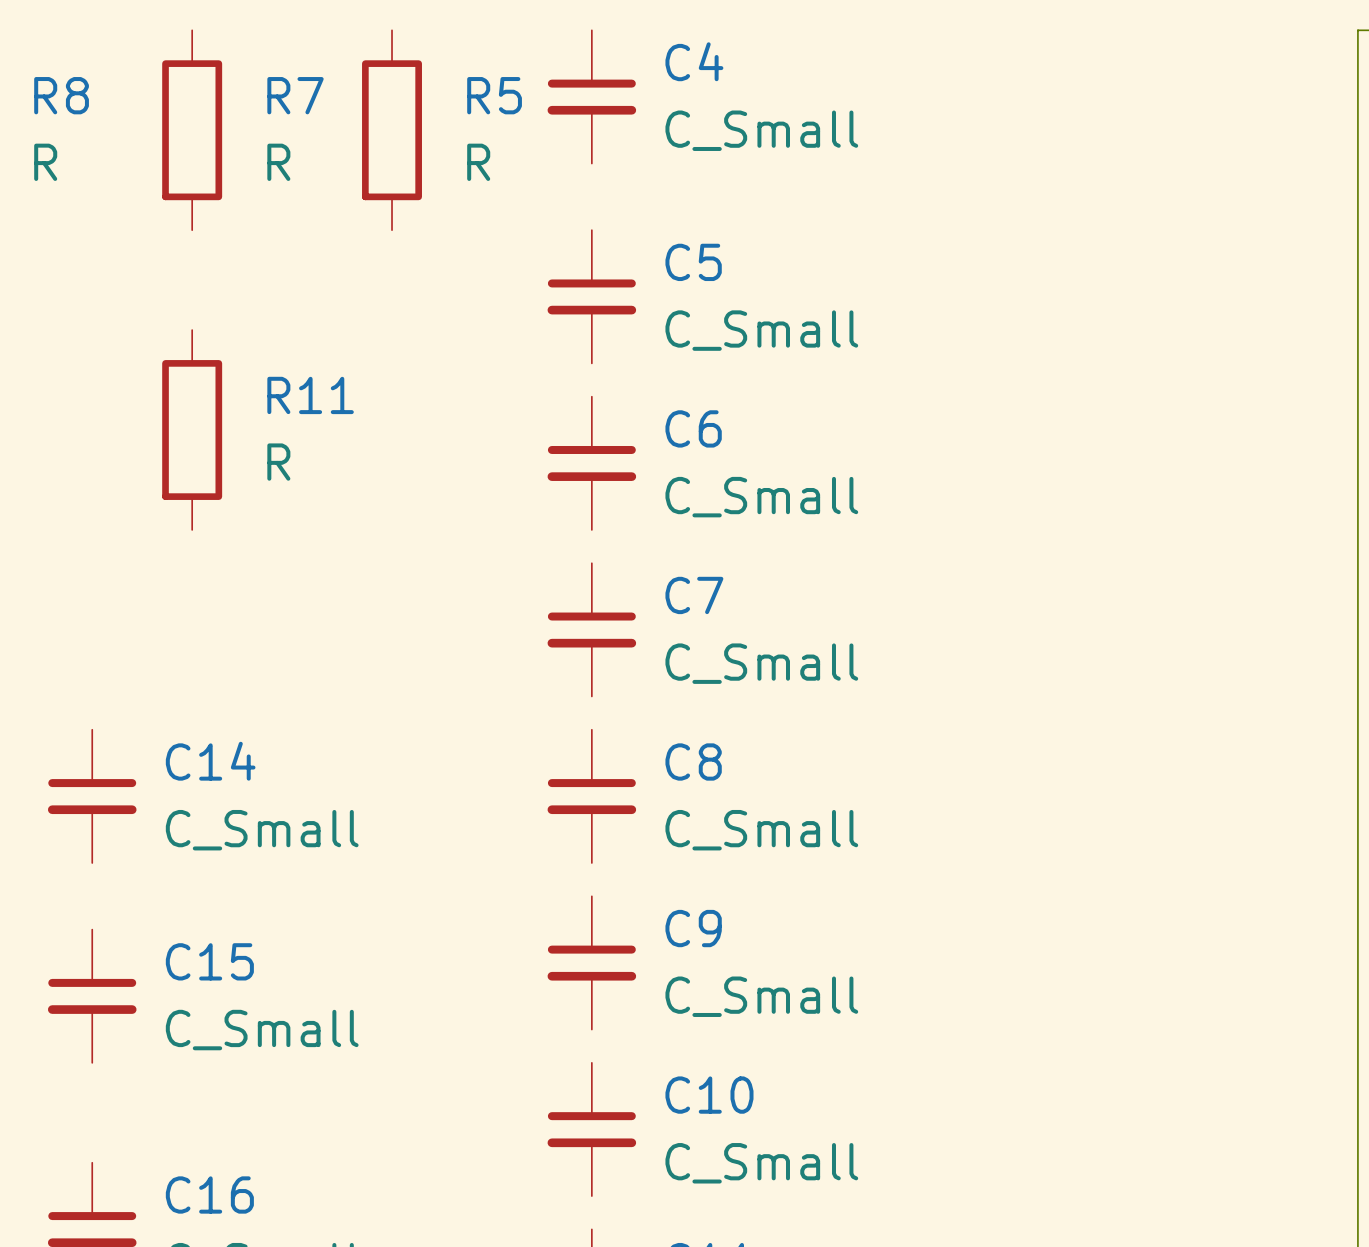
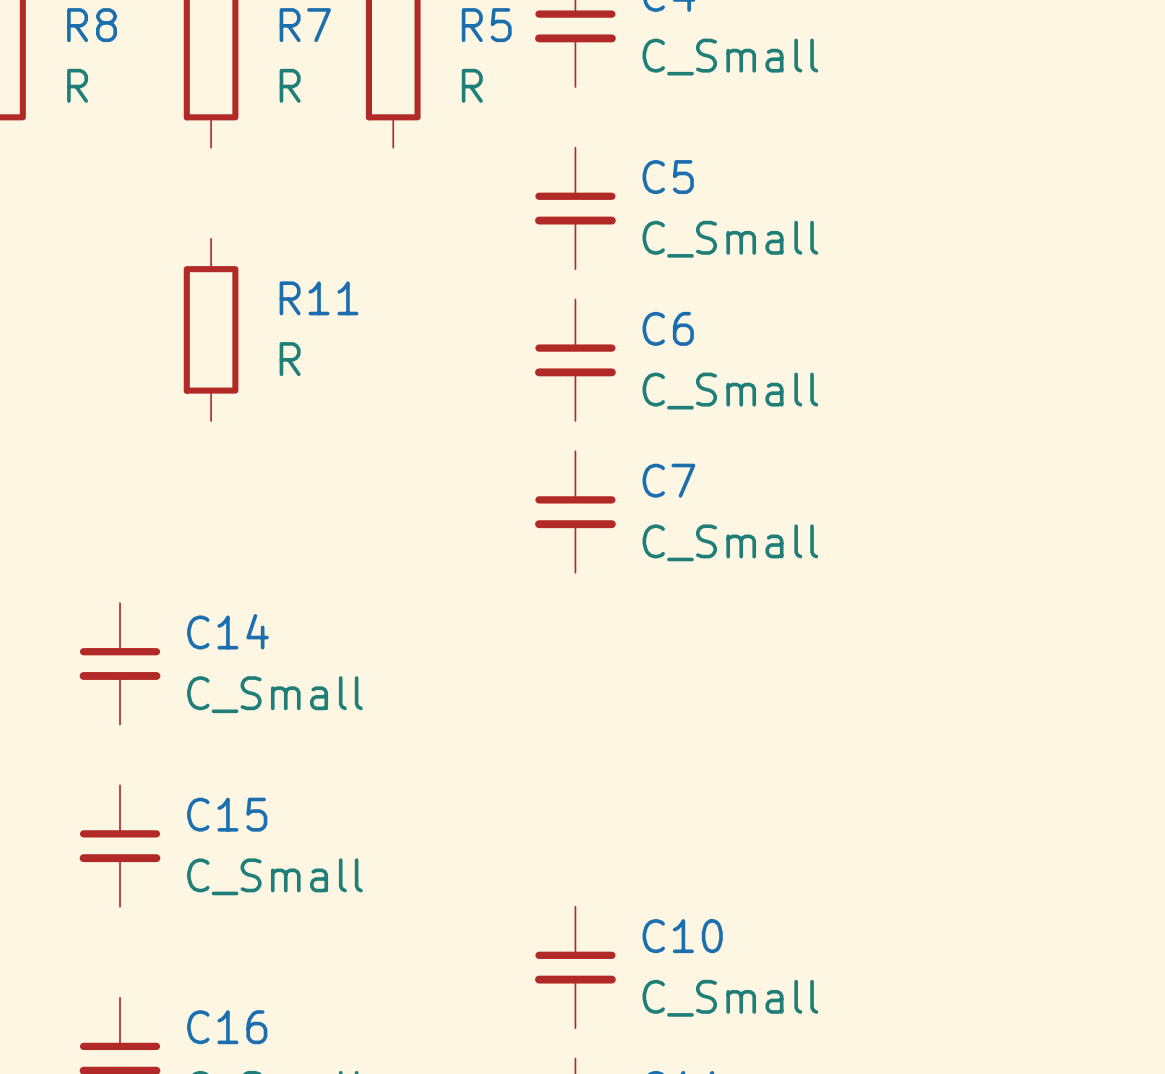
C8: C_Small (591, 796) -> none
C9: C_Small (591, 962) -> none

